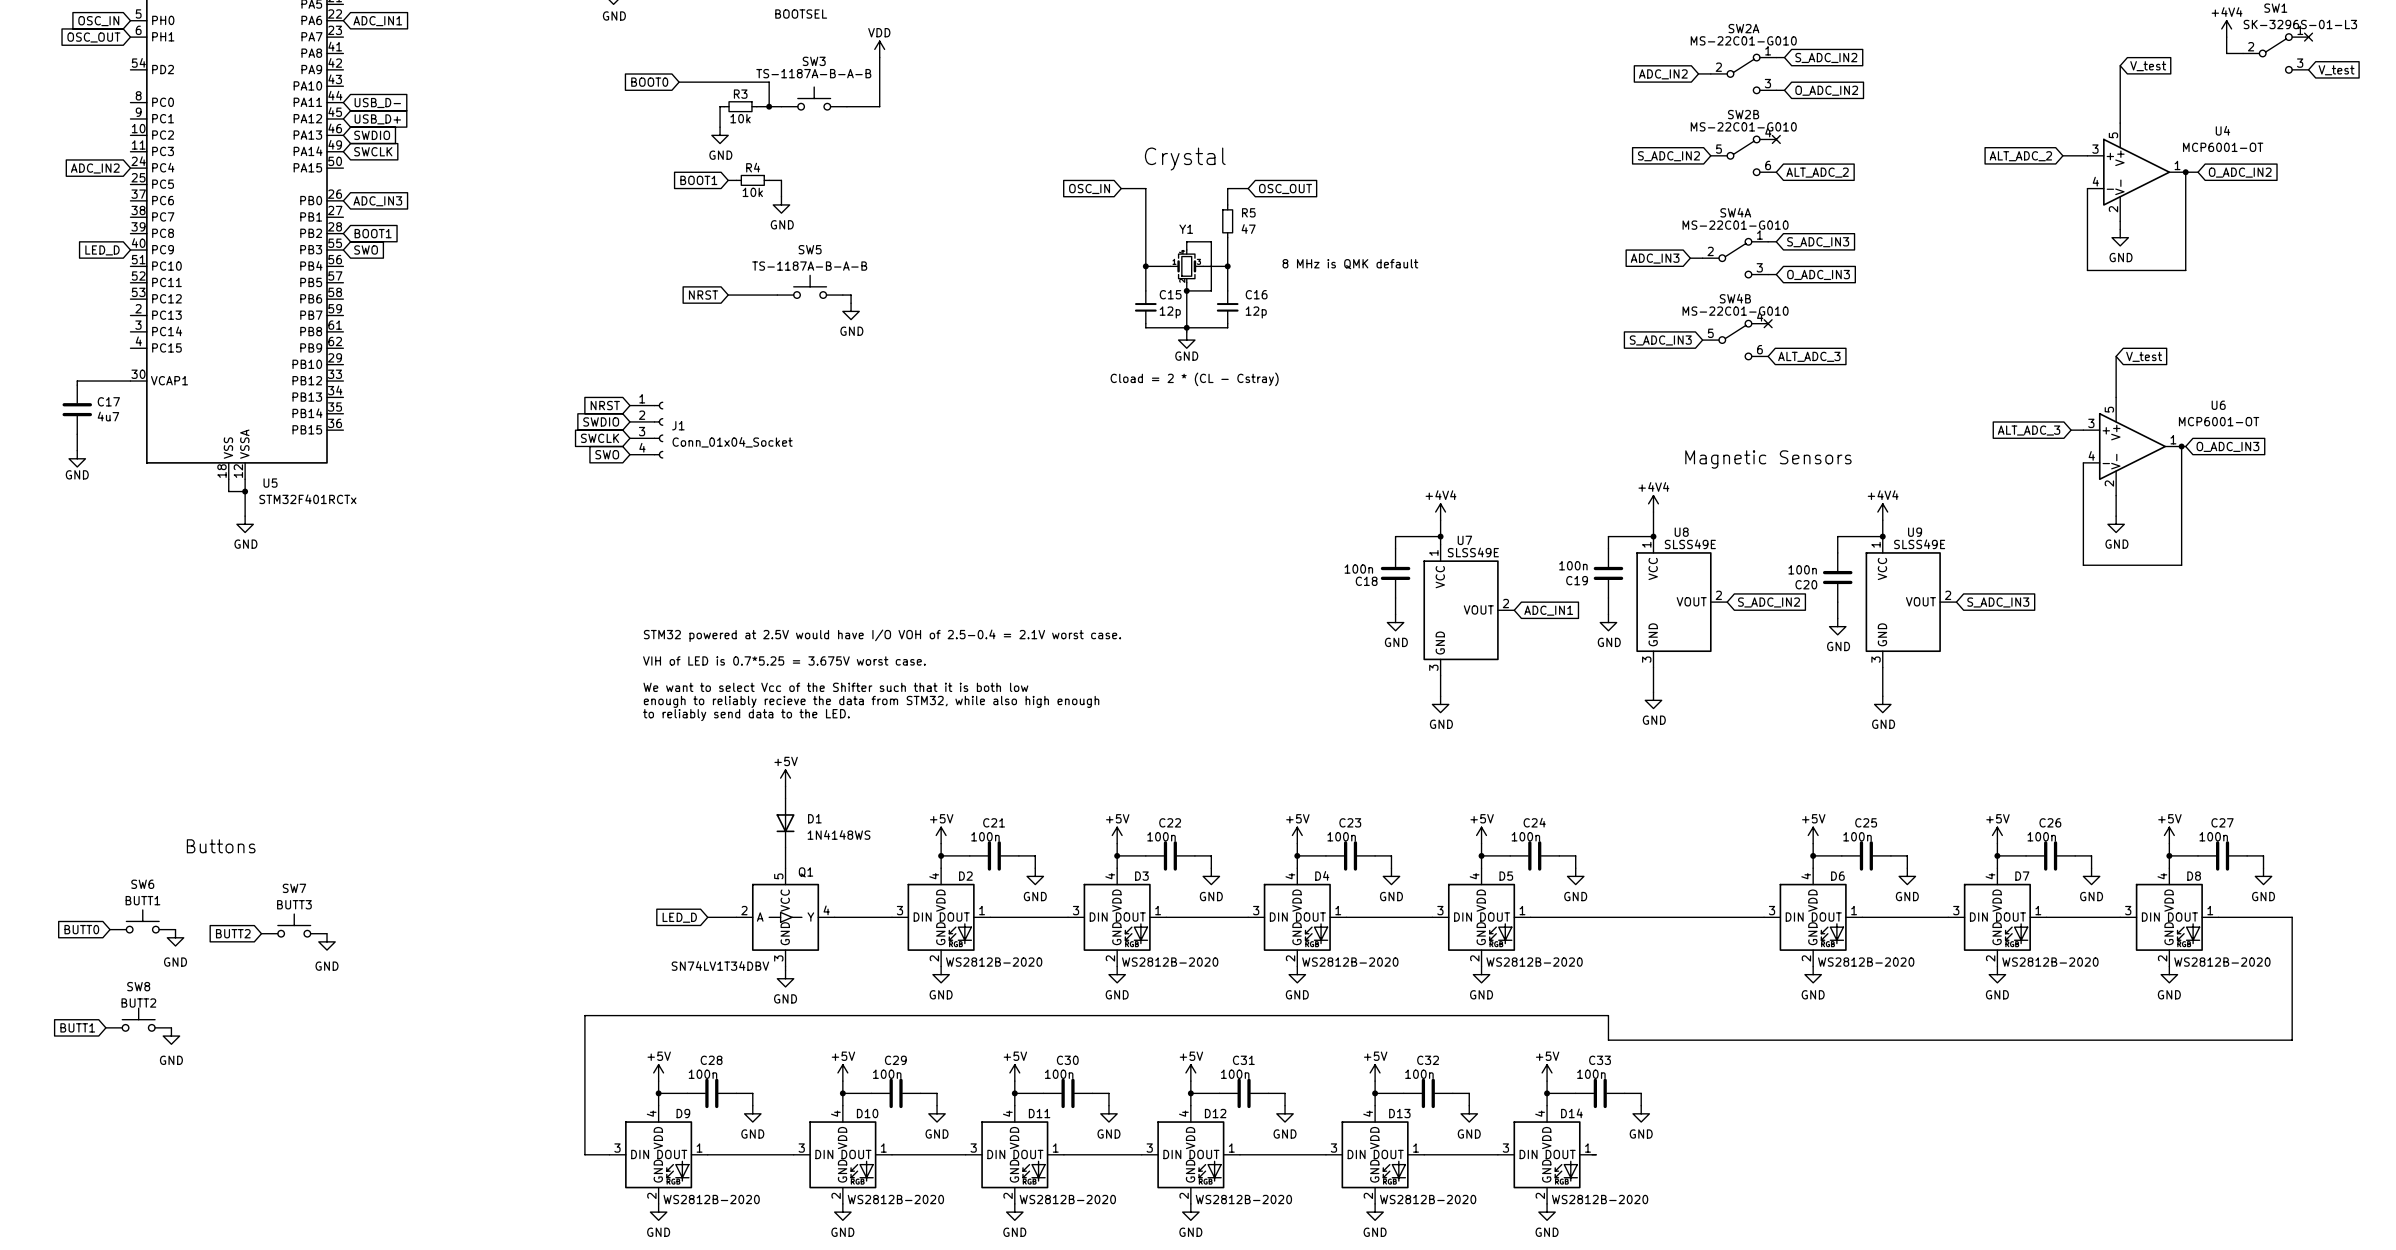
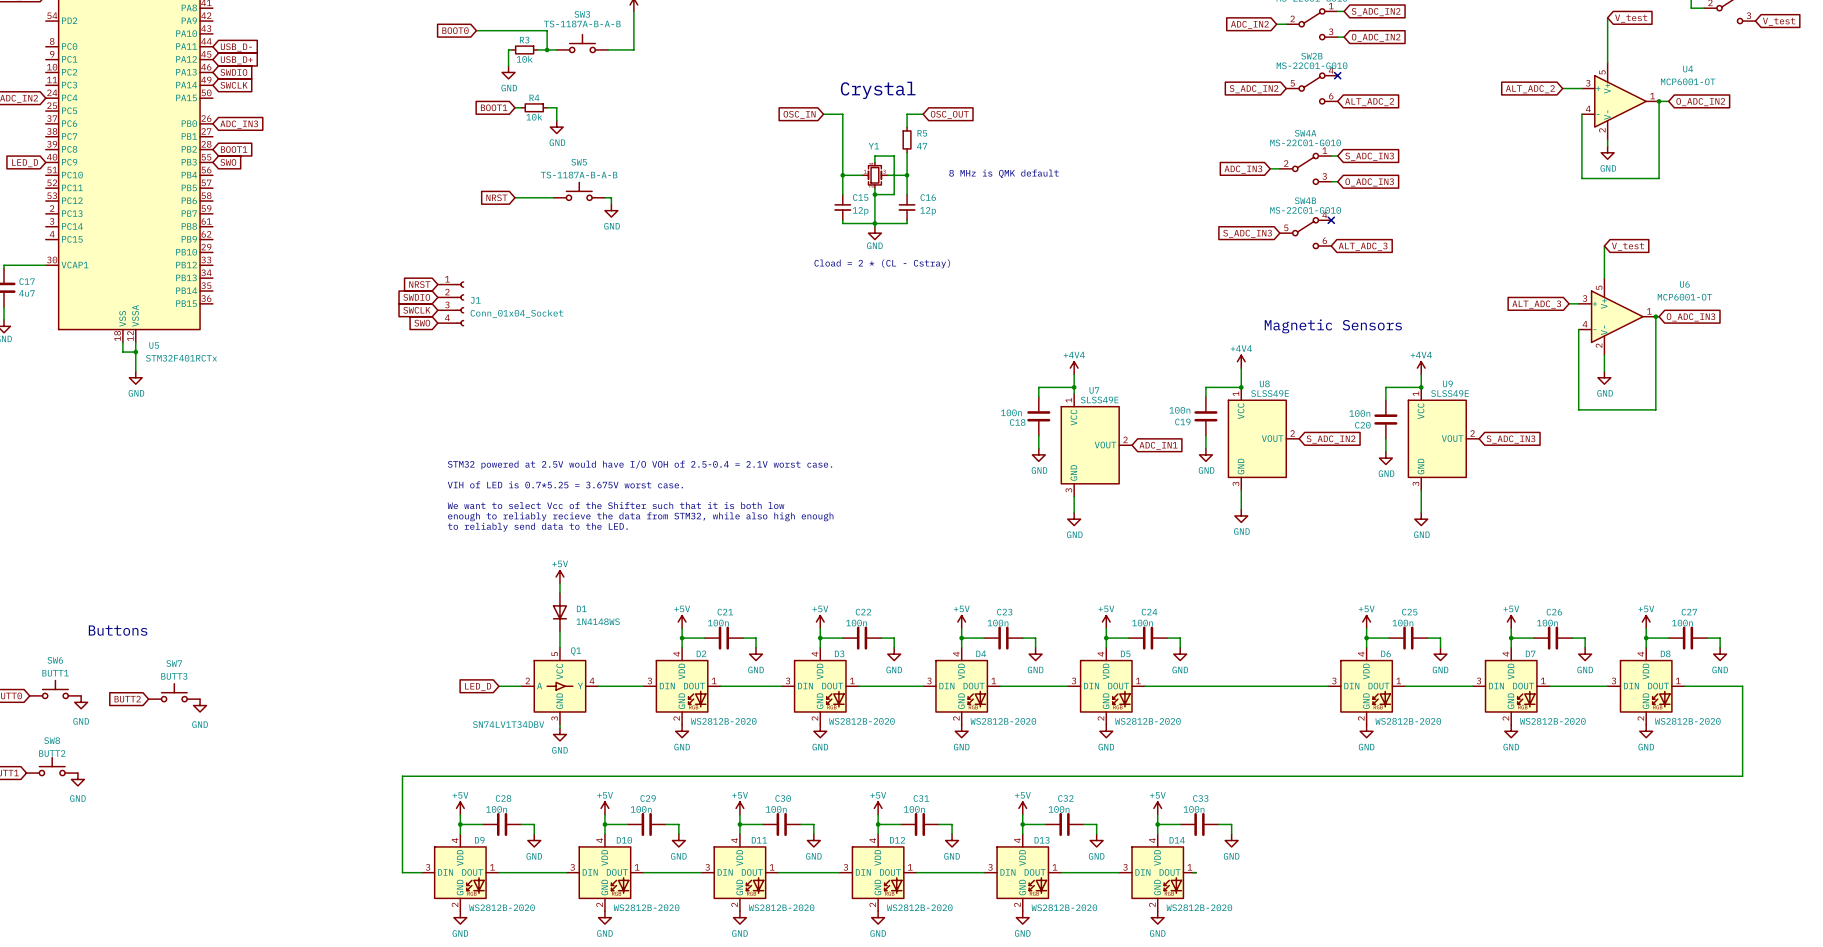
wire: (584, 1031) (584, 1015) (1608, 1015) (1608, 1040) (2292, 1040) (2292, 1031) -> (402, 776) (1742, 776)

